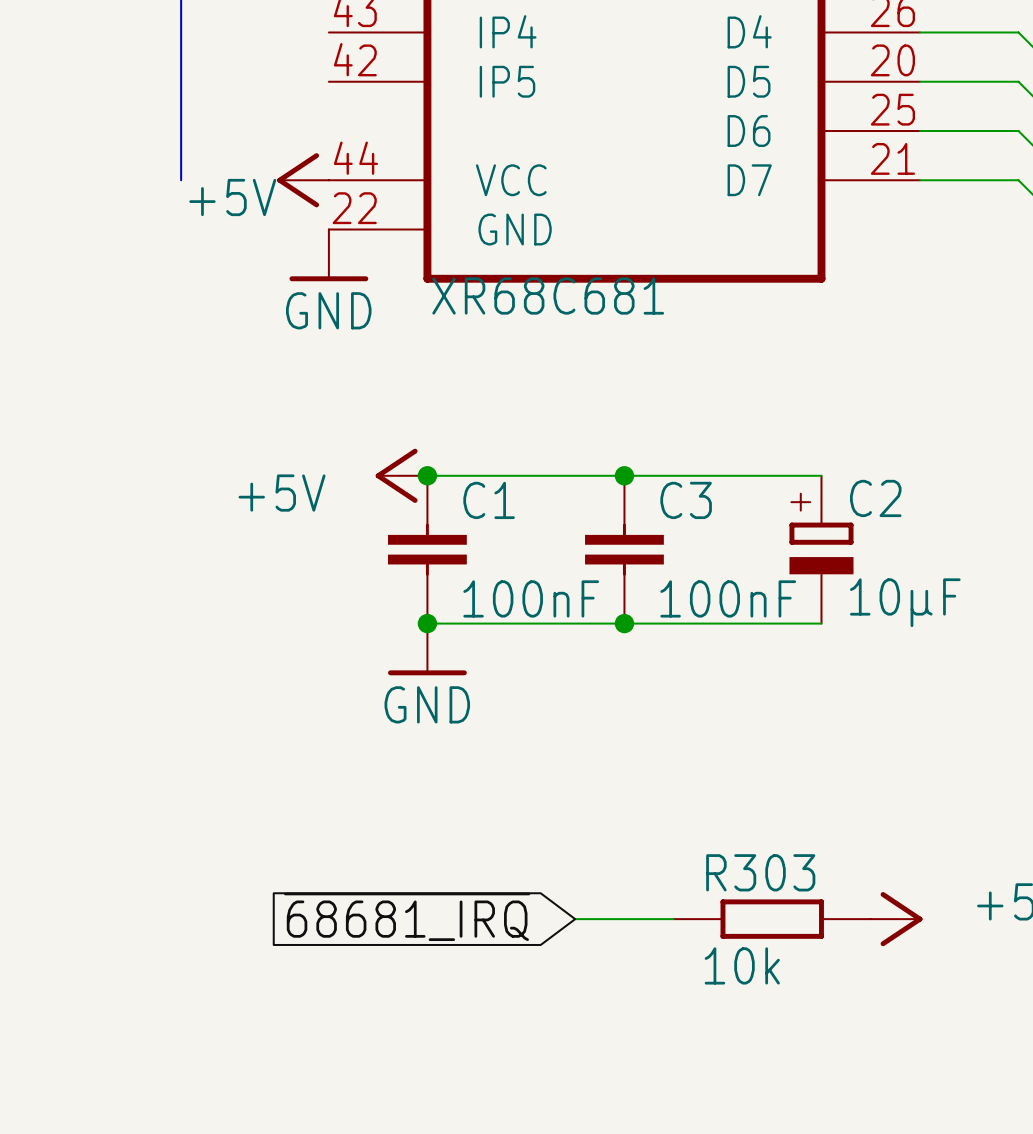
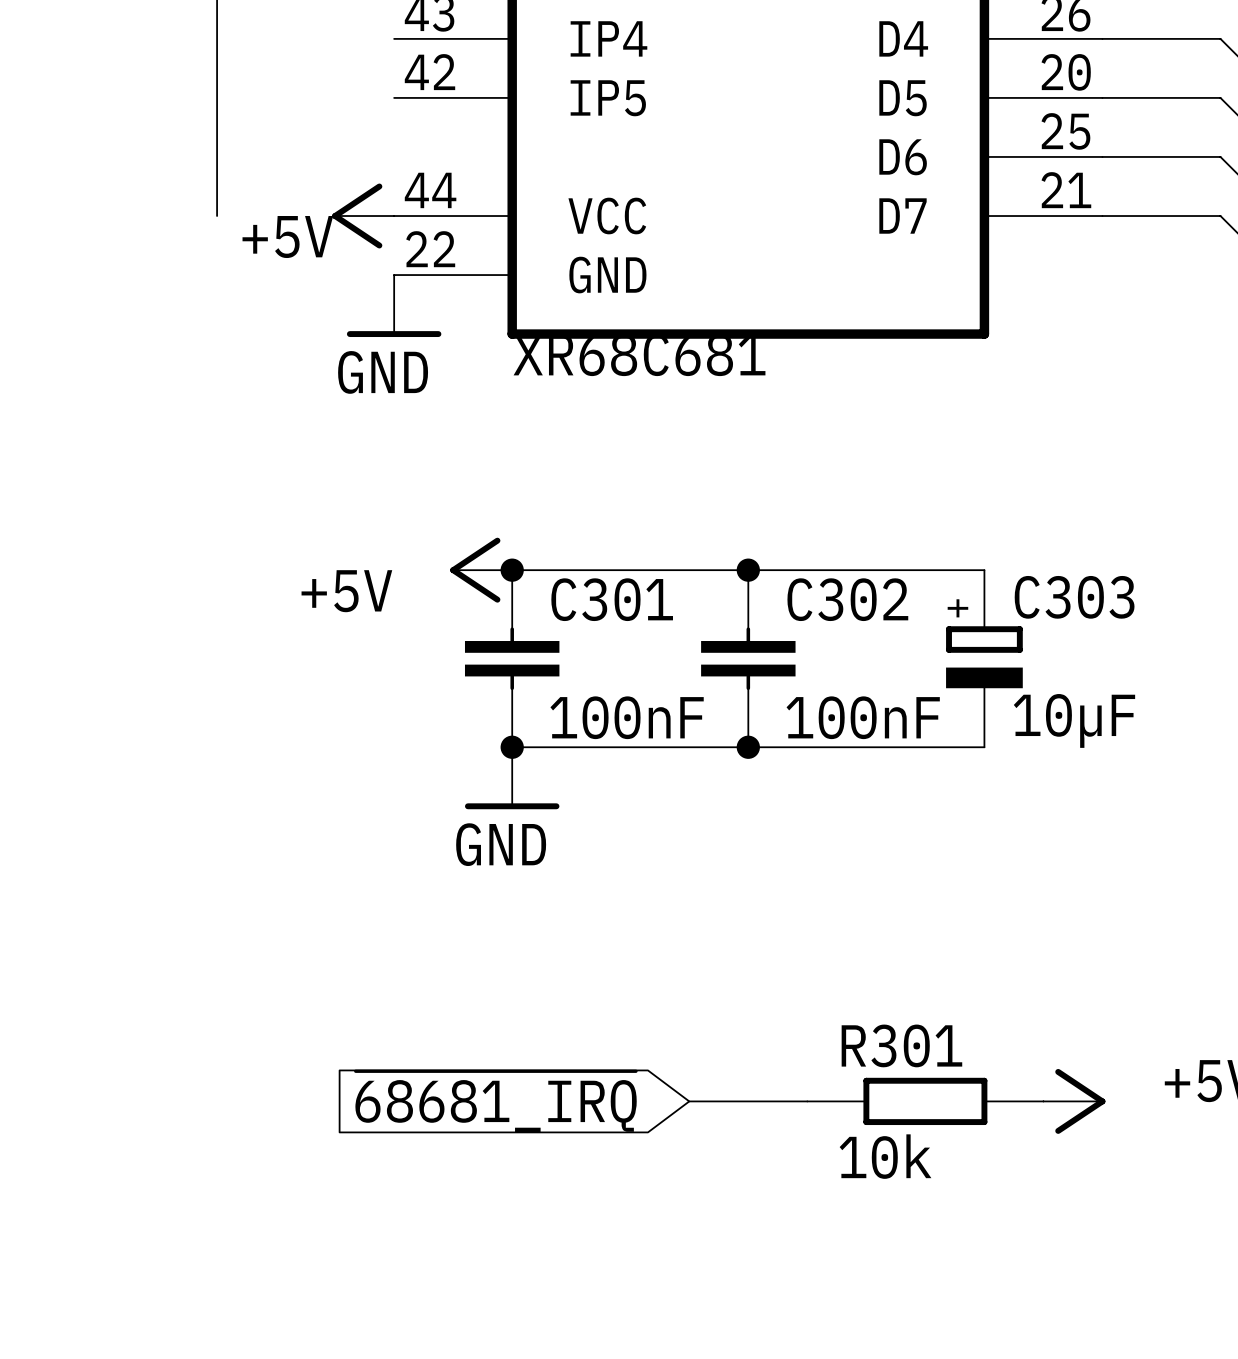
C2 name: C2 (875, 498) -> C303 (1074, 597)
C1 name: C1 (489, 500) -> C301 (612, 599)
C3 name: C3 (686, 500) -> C302 (847, 599)
R303 name: R303 (760, 872) -> R301 (901, 1045)

